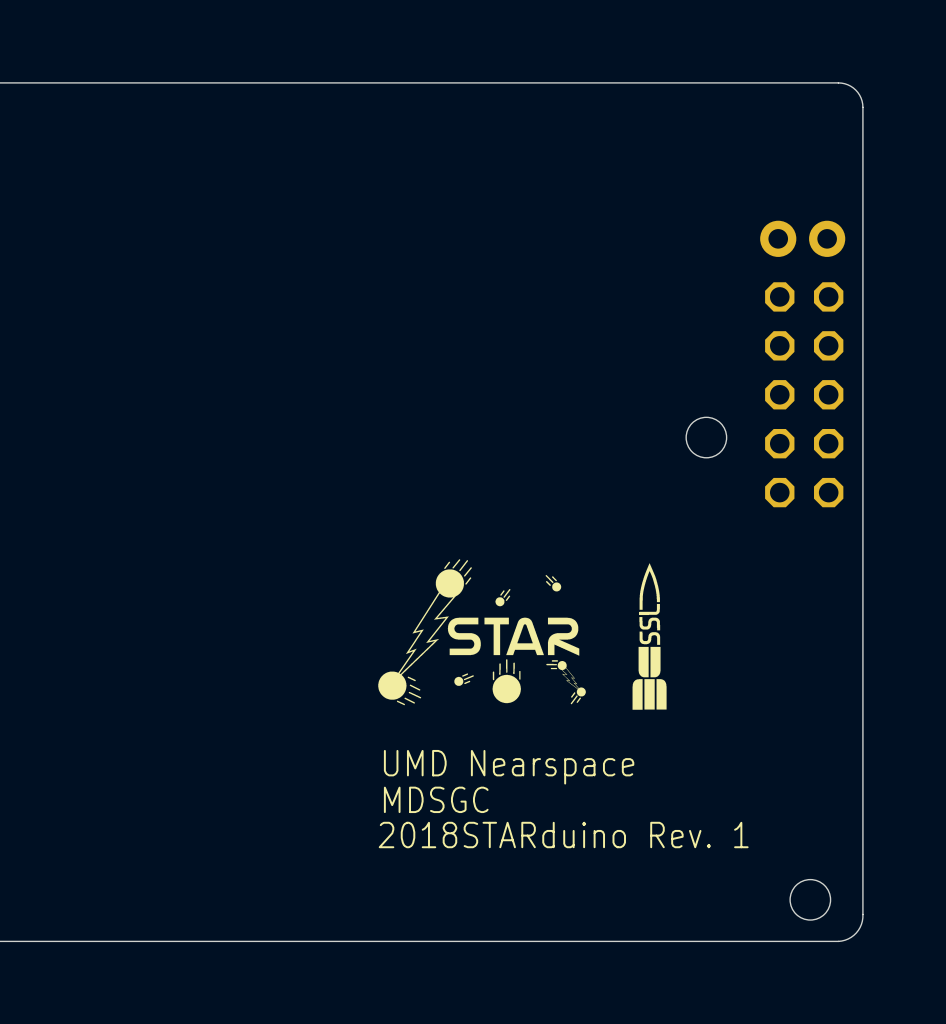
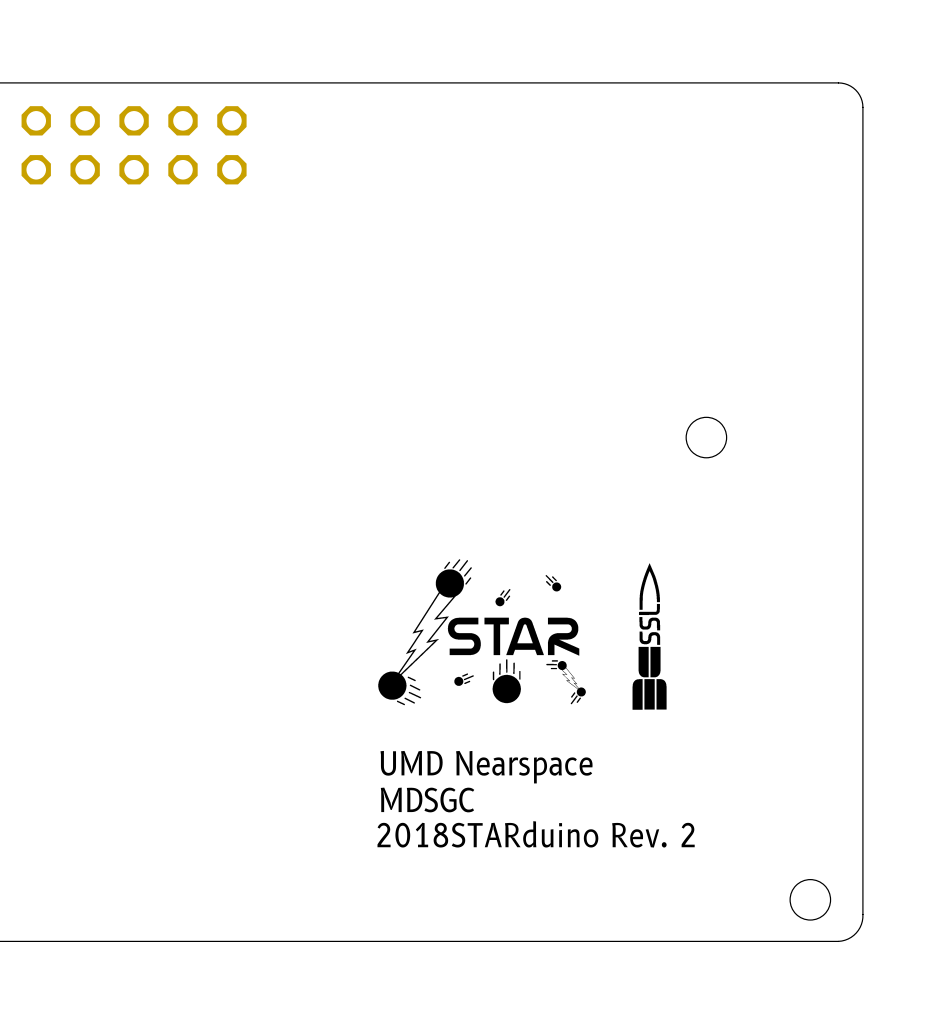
part: none -> (134, 145)
part: (802, 238) -> none
part: (804, 394) -> none
text: 2018STARduino Rev. 1 (563, 835) -> 2018STARduino Rev. 2 (536, 834)

